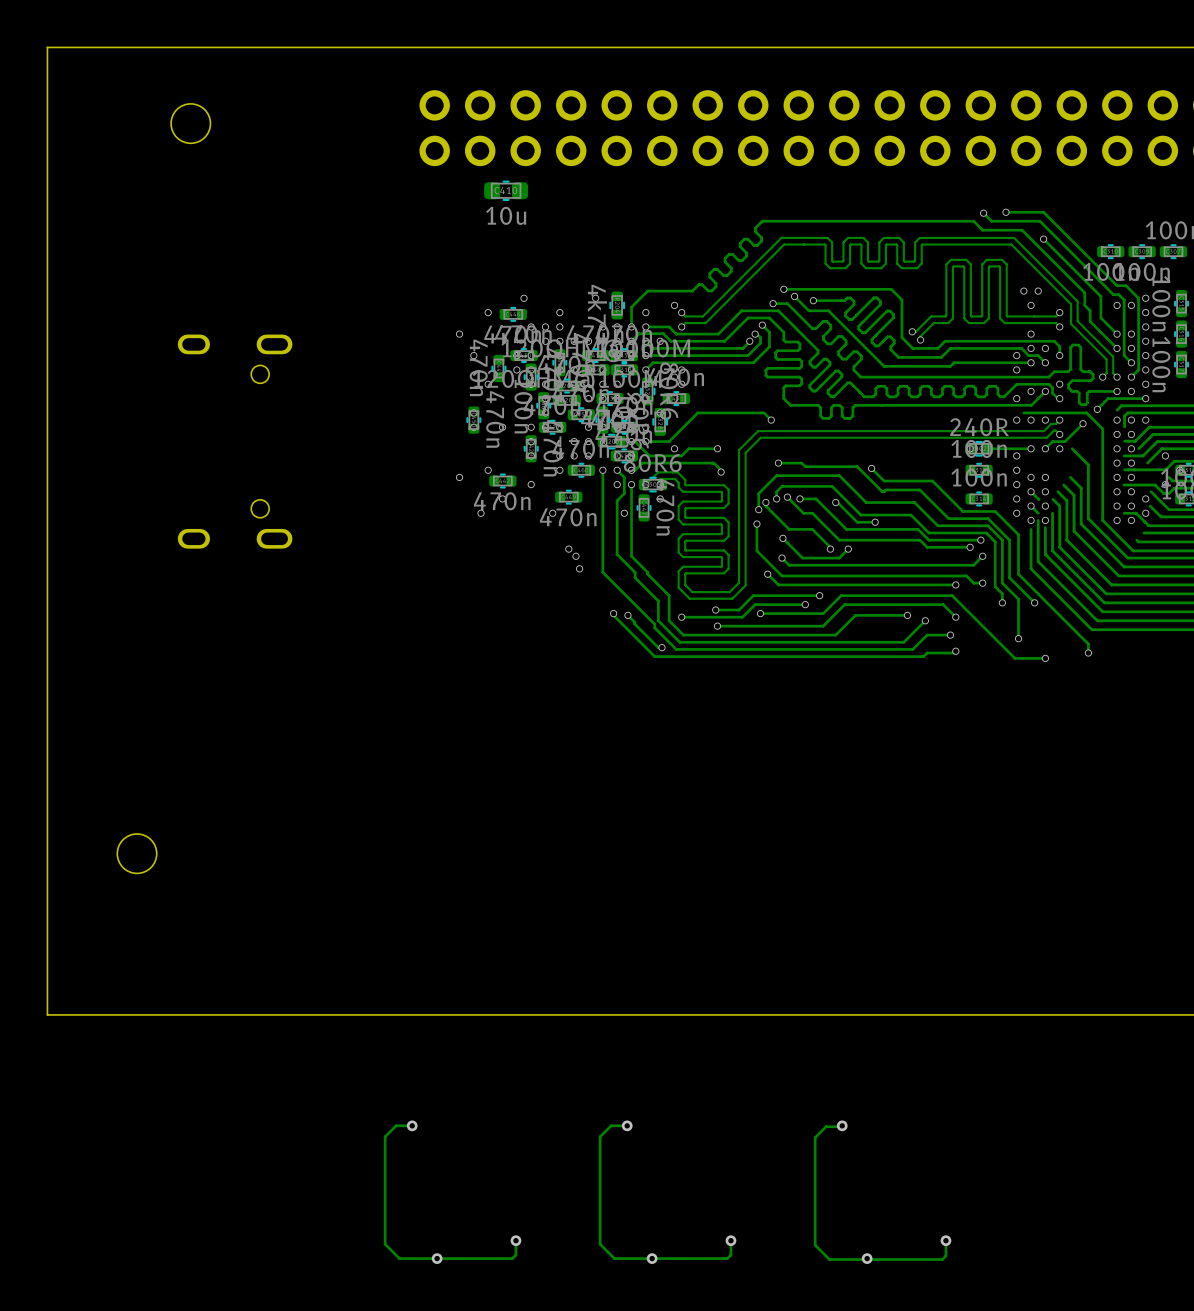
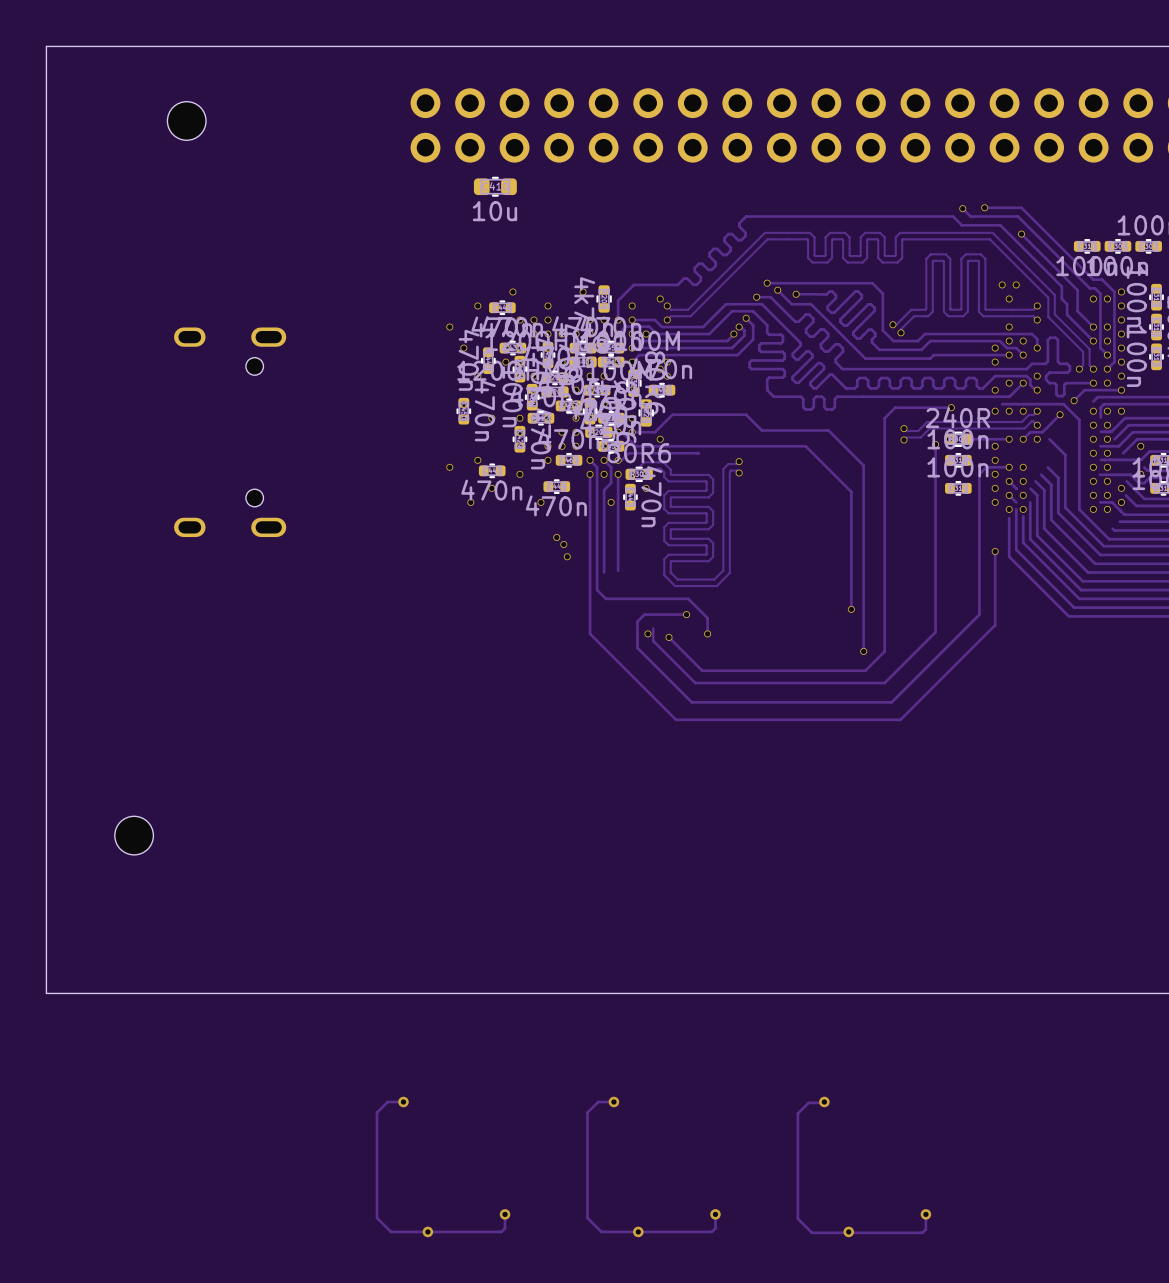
track: none -> (951, 407) (895, 407) (884, 418) (884, 651) (865, 670) (702, 670) (669, 637)
via: none -> (951, 407)
track: (771, 420) (764, 412) (697, 412) (687, 423) -> (863, 651) (863, 465) (828, 430) (761, 430) (746, 414) (672, 414)
via: (771, 420) -> none
track: (947, 431) (758, 431) (739, 450) (739, 479) -> (927, 422) (918, 431) (906, 431) (903, 428)
via: none -> (903, 428)
track: (950, 437) (760, 437) (745, 452) (745, 481) -> (929, 428) (920, 437) (906, 437) (903, 439)
track: (717, 448) (688, 448) (681, 455) -> (851, 609) (851, 491) (805, 446) (667, 446)
via: (717, 448) -> none
via: none -> (903, 439)
track: none -> (935, 444) (935, 632) (884, 683) (695, 683) (653, 640) (653, 628)
via: none -> (935, 444)
track: (713, 463) (721, 472) -> none
track: (778, 463) (801, 463) (805, 466) (857, 466) (882, 491) (885, 489) (919, 489) (948, 518) (988, 518) (1009, 540) (1009, 577) (1034, 602) -> none
via: (778, 463) -> none
track: (871, 468) (884, 481) (932, 481) (962, 511) (995, 511) (1018, 534) (1018, 574) (1088, 644) (1088, 653) -> none
via: (871, 468) -> none
track: (602, 470) (602, 484) -> (590, 460) (597, 467) (597, 590) (605, 598) (688, 598) (707, 618) (707, 633)
track: none -> (739, 461) (736, 464) (728, 464) (723, 469)
via: none -> (739, 461)
via: (721, 472) -> none
track: none -> (1009, 467) (986, 467) (979, 474) (979, 614) (891, 702) (691, 702) (637, 647) (637, 621) (644, 614) (686, 614)
track: none -> (729, 471) (736, 470) (739, 473)
via: none -> (739, 473)
via: none -> (590, 474)
track: (787, 497) (803, 513) (812, 513) (839, 540) (919, 540) (927, 547) (970, 547) -> none
via: (787, 497) -> none
track: (776, 498) (776, 491) (782, 486) (832, 486) (860, 515) (911, 515) (928, 532) (986, 532) (995, 541) (995, 586) (1002, 593) (1002, 602) -> none
via: (776, 498) -> none
track: (799, 498) (816, 498) (846, 529) (918, 529) (928, 540) (980, 540) -> none
via: (799, 498) -> none
track: (765, 502) (765, 506) (789, 529) (812, 529) (830, 549) -> none
via: (765, 502) -> none
track: (835, 502) (857, 522) (875, 522) -> none
via: (835, 502) -> none
via: (758, 509) -> none
track: (760, 509) (758, 509) (758, 493) (776, 475) (839, 475) (866, 502) (914, 502) (937, 525) (988, 525) (1002, 540) (1002, 583) (1018, 599) (1018, 638) -> none
via: (875, 522) -> none
via: (756, 524) -> none
track: (758, 524) (756, 524) (756, 550) (782, 575) (966, 575) (973, 583) (982, 583) -> none
track: (782, 538) (802, 558) (839, 558) (848, 549) -> none
via: (782, 538) -> none
via: (980, 540) -> none
via: (970, 547) -> none
via: (830, 549) -> none
via: (848, 549) -> none
track: (617, 554) (635, 572) (635, 577) (658, 601) (658, 620) (679, 642) (903, 642) (925, 620) -> (604, 542) (604, 572)
track: (631, 556) (669, 595) (669, 620) (683, 635) (835, 635) (855, 615) (907, 615) -> (618, 544) (618, 570)
track: (982, 556) (973, 565) (789, 565) (782, 558) -> none
via: (982, 556) -> none
via: (782, 558) -> none
via: none -> (995, 551)
track: (602, 572) (654, 624) (654, 627) (676, 649) (912, 649) (927, 635) (950, 635) -> (590, 560) (590, 633) (676, 719) (900, 719) (995, 625) (995, 551)
track: (767, 574) (778, 584) (955, 584) -> none
via: (767, 574) -> none
via: (982, 583) -> none
via: (955, 584) -> none
track: (819, 595) (753, 595) (739, 610) (715, 610) -> none
via: (819, 595) -> none
via: (1002, 602) -> none
via: (1034, 602) -> none
track: (805, 604) (755, 604) (742, 617) (681, 617) -> none
via: (805, 604) -> none
via: (715, 610) -> none
track: (613, 613) (654, 656) (923, 656) (927, 653) (954, 653) (955, 651) -> none
via: (613, 613) -> none
track: (760, 613) (823, 613) (841, 595) (952, 595) (1014, 658) (1045, 658) -> none
via: (760, 613) -> none
track: (627, 615) (635, 622) -> none
via: (627, 615) -> none
via: (907, 615) -> none
via: (681, 617) -> none
track: (955, 617) (943, 604) (844, 604) (823, 626) (717, 626) -> none
via: (955, 617) -> none
via: (925, 620) -> none
track: (634, 621) (658, 647) (661, 647) -> none
via: none -> (851, 609)
via: (717, 626) -> none
via: none -> (686, 614)
via: (950, 635) -> none
via: (1018, 638) -> none
via: none -> (707, 633)
via: none -> (669, 637)
via: (955, 651) -> none
via: (1088, 653) -> none
via: (1045, 658) -> none
via: none -> (863, 651)

